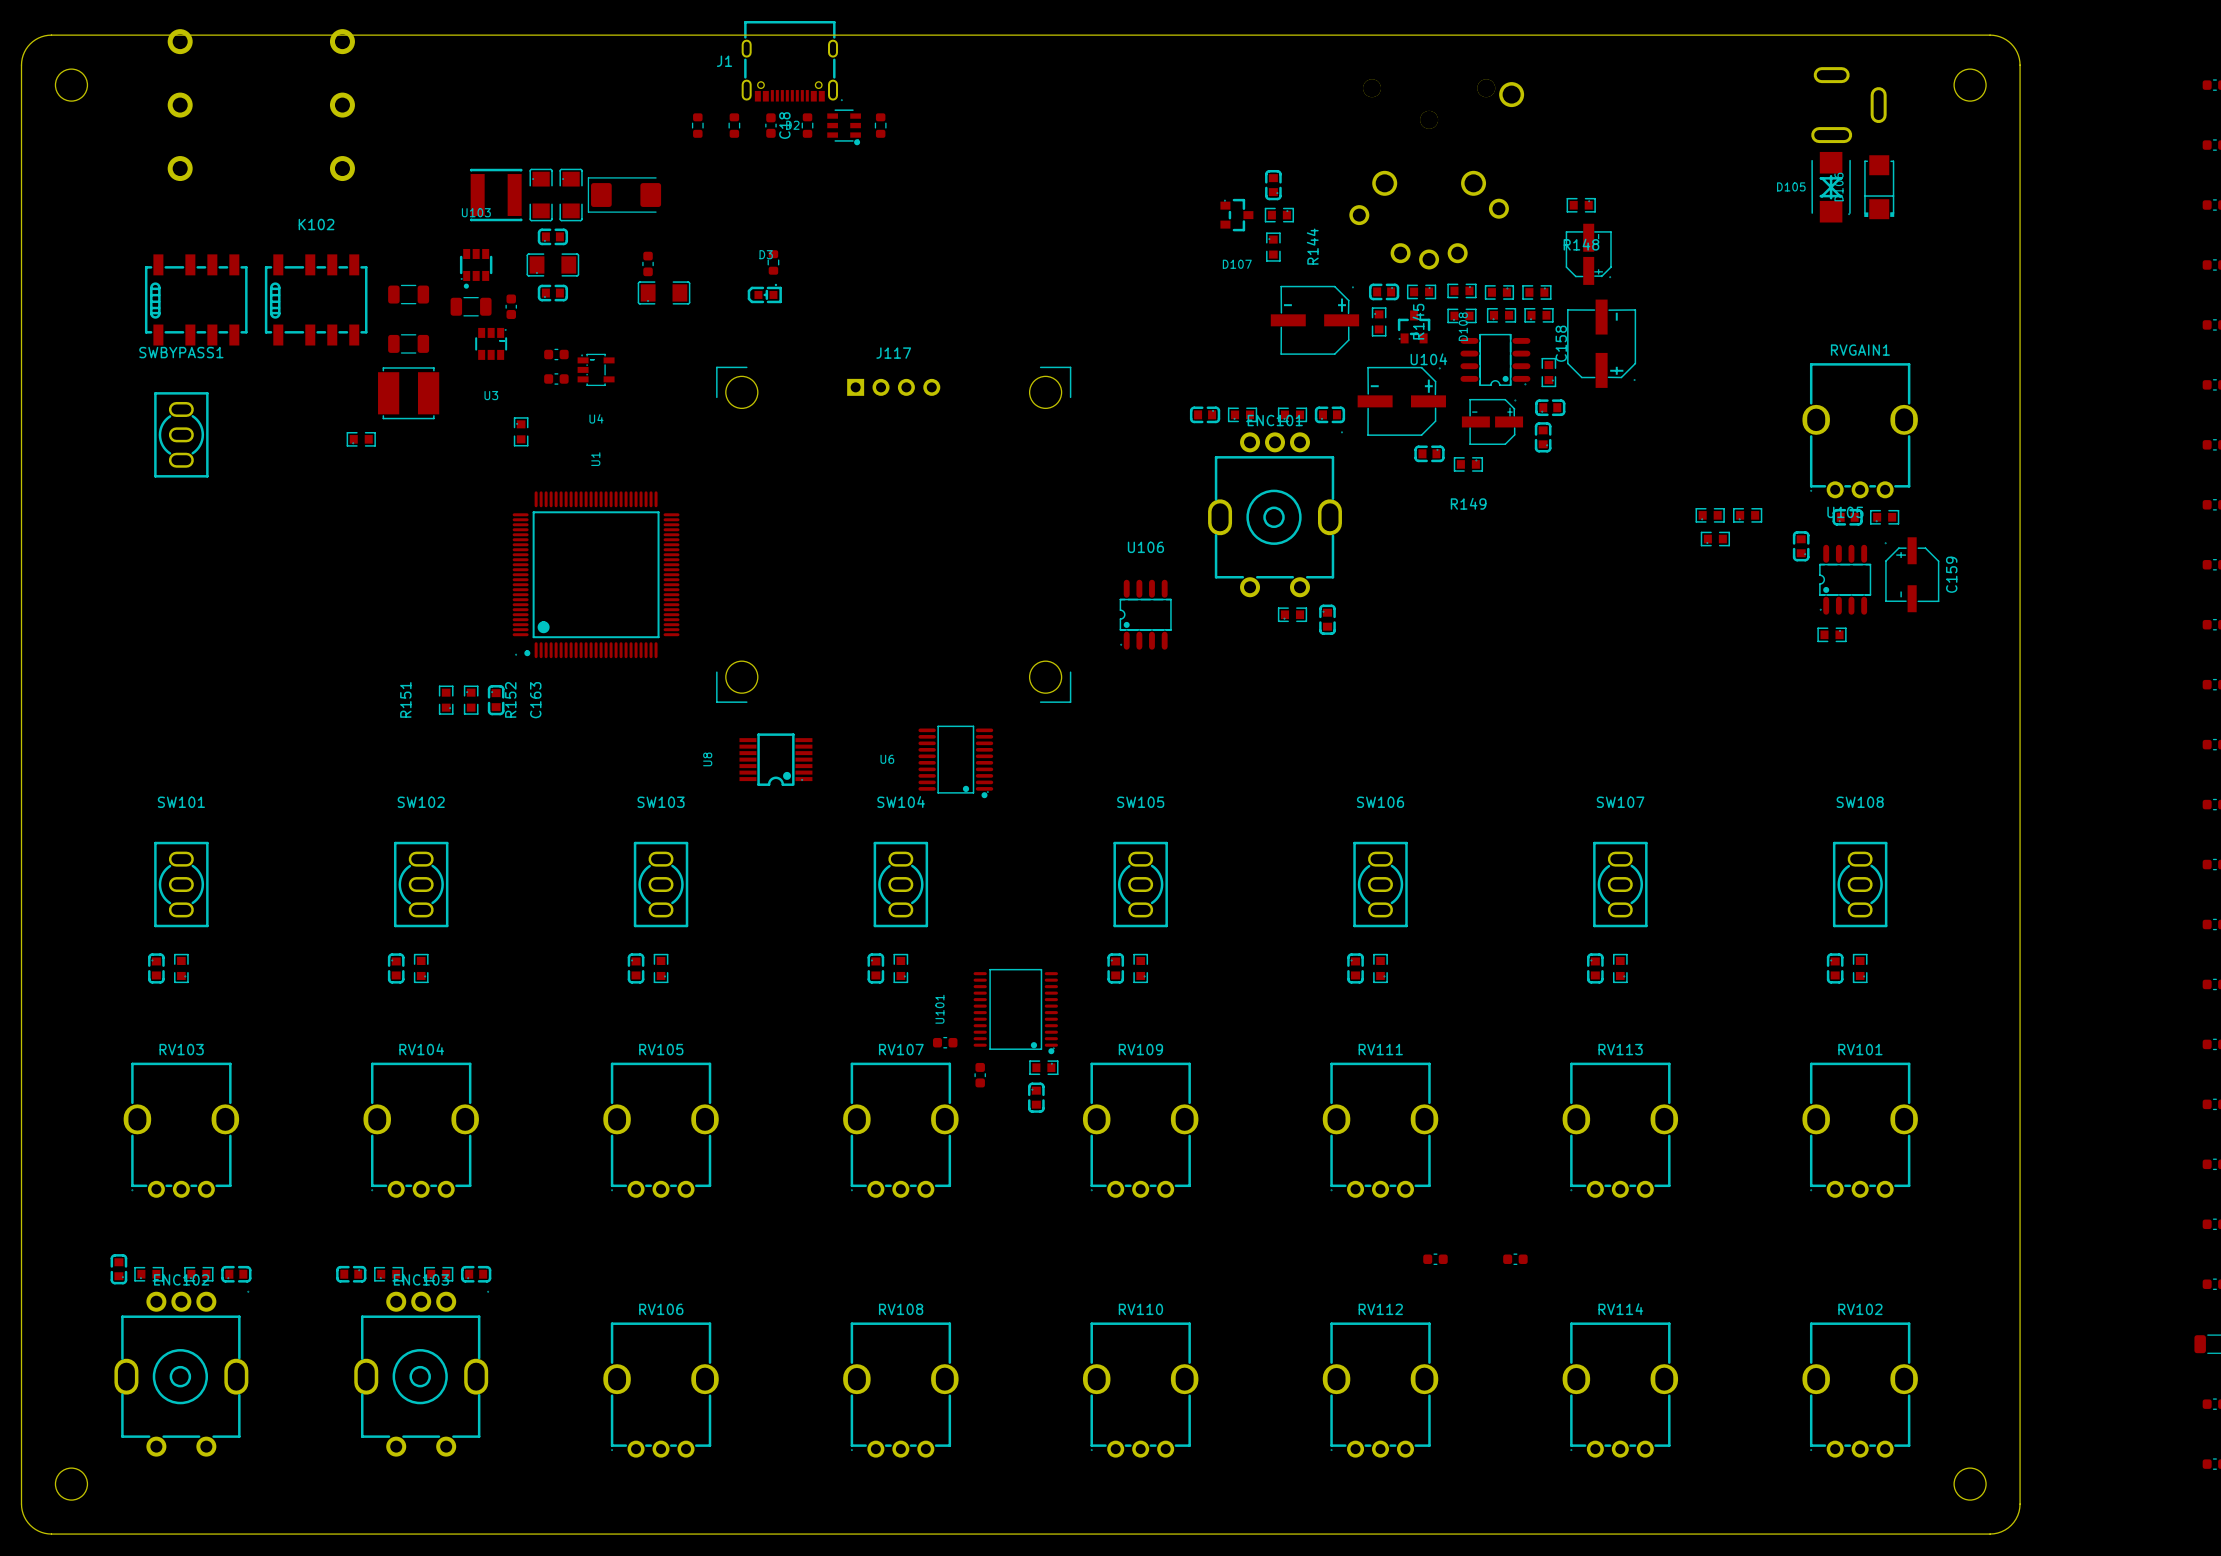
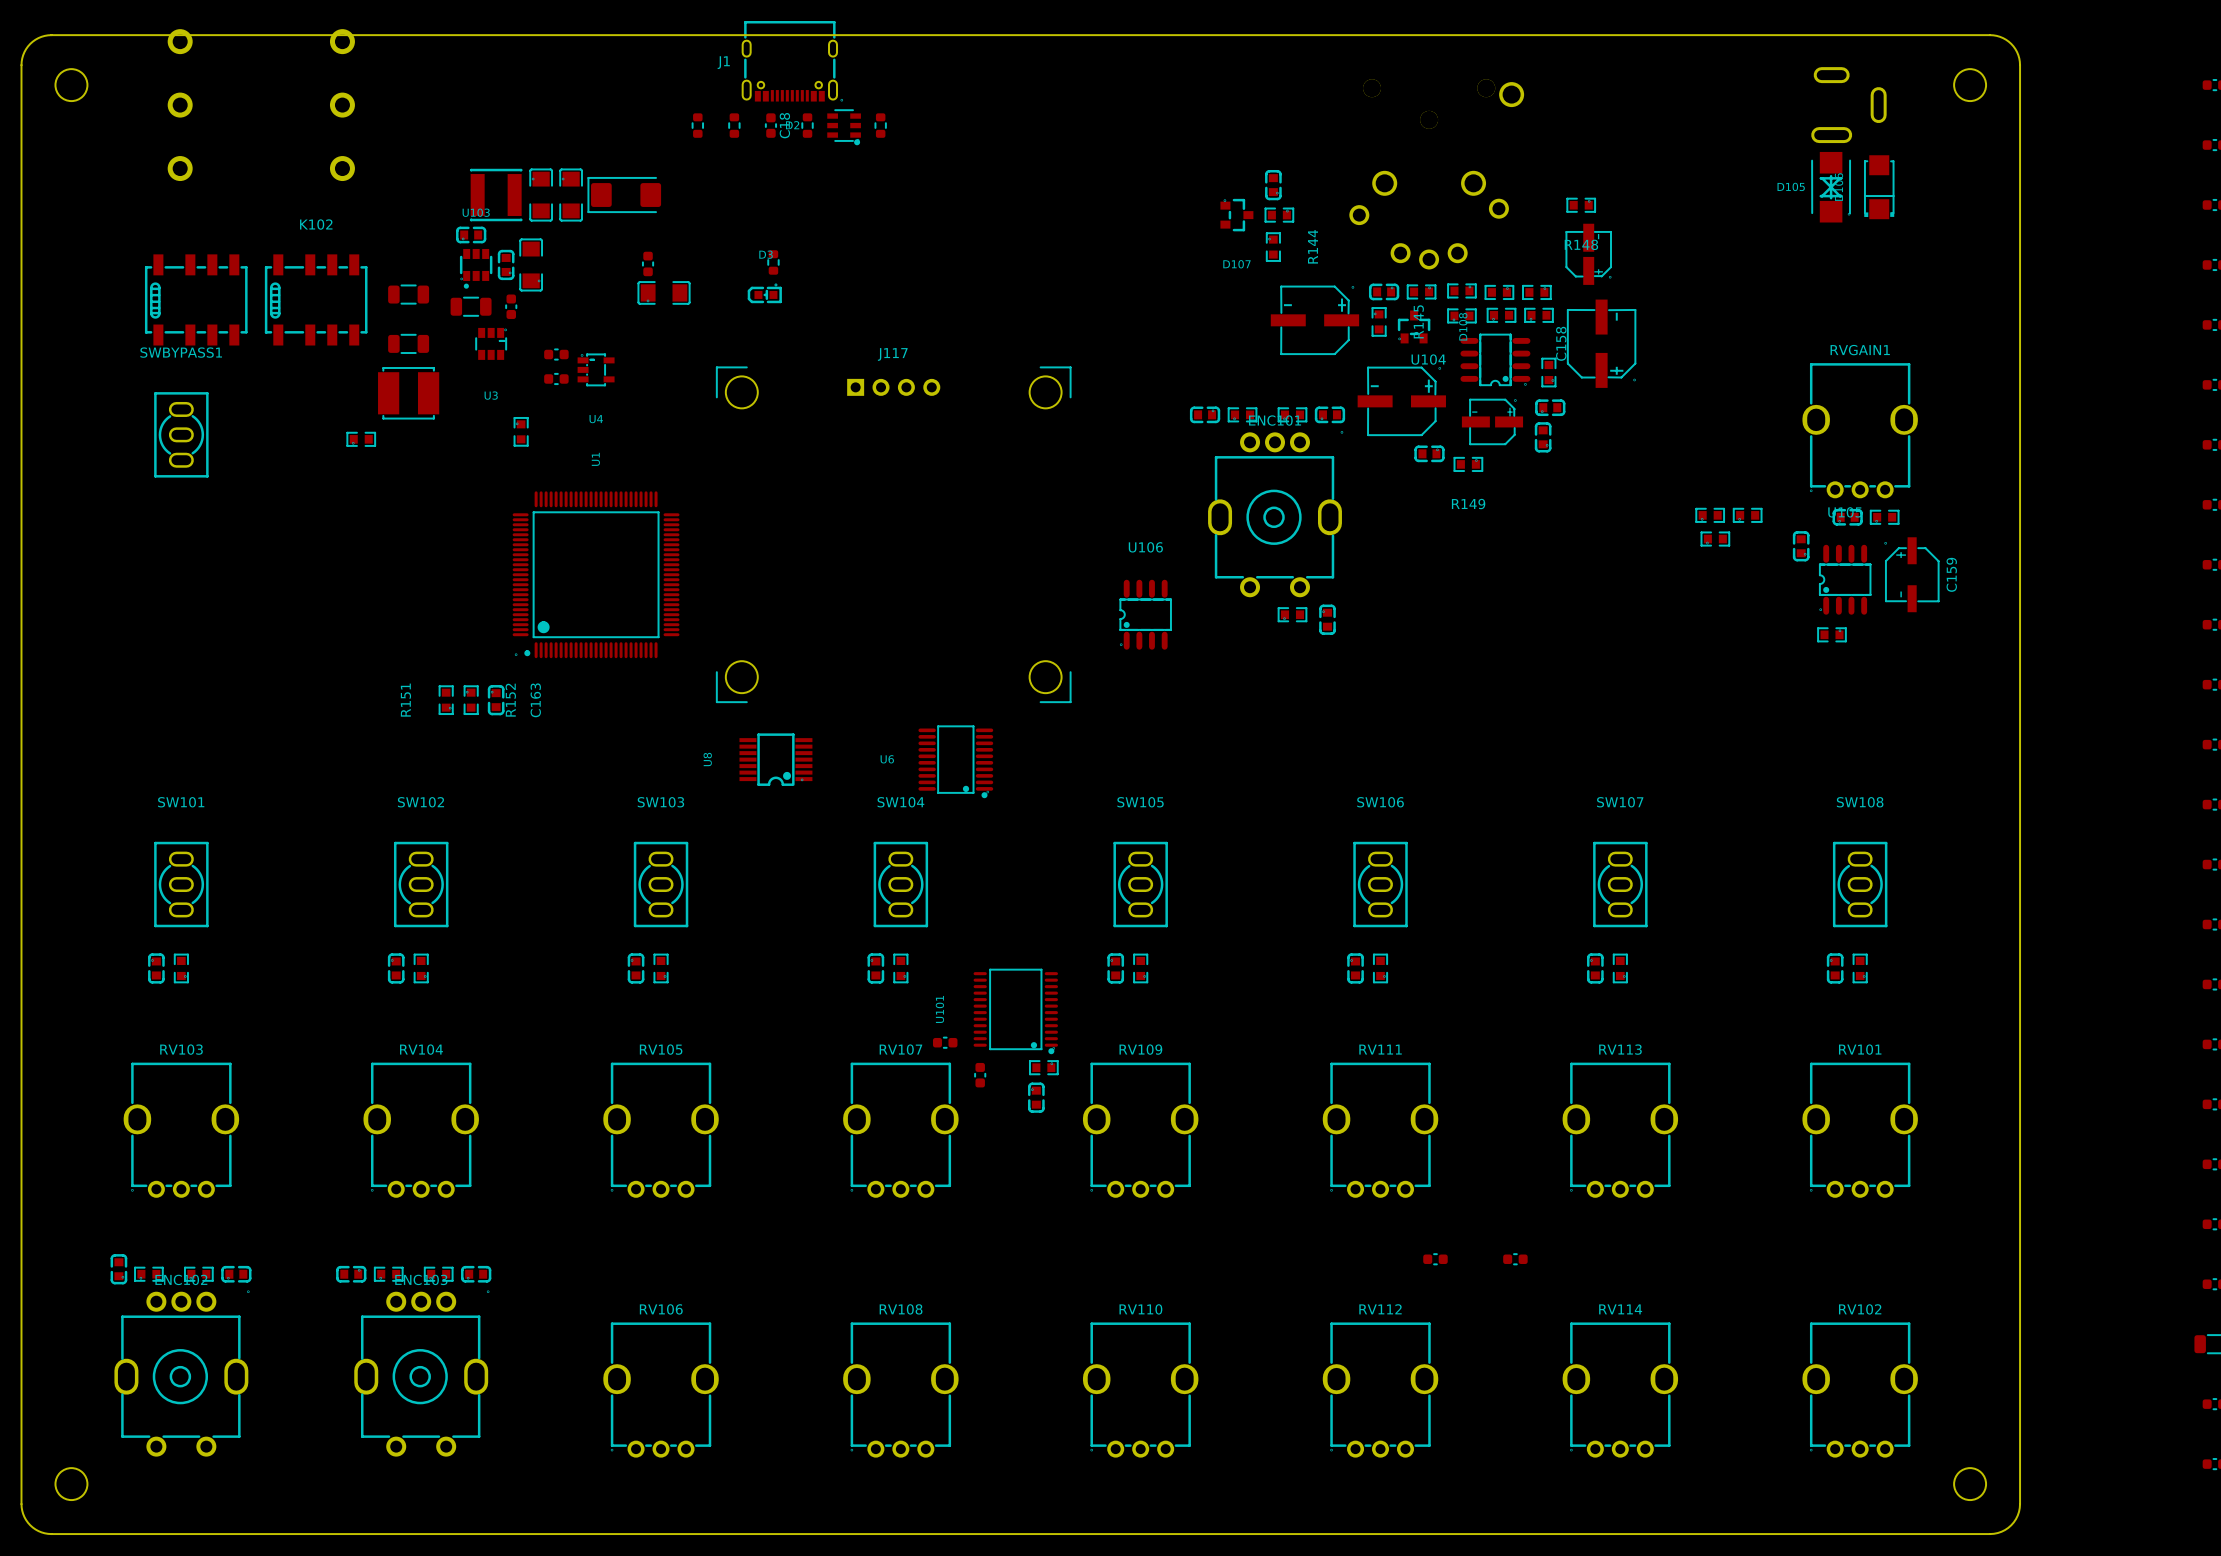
part: none -> (471, 234)
part: (552, 236) -> none
part: none -> (506, 264)
part rotation: 0° (552, 264) -> 90° counterclockwise (531, 264)
part: (552, 293) -> none

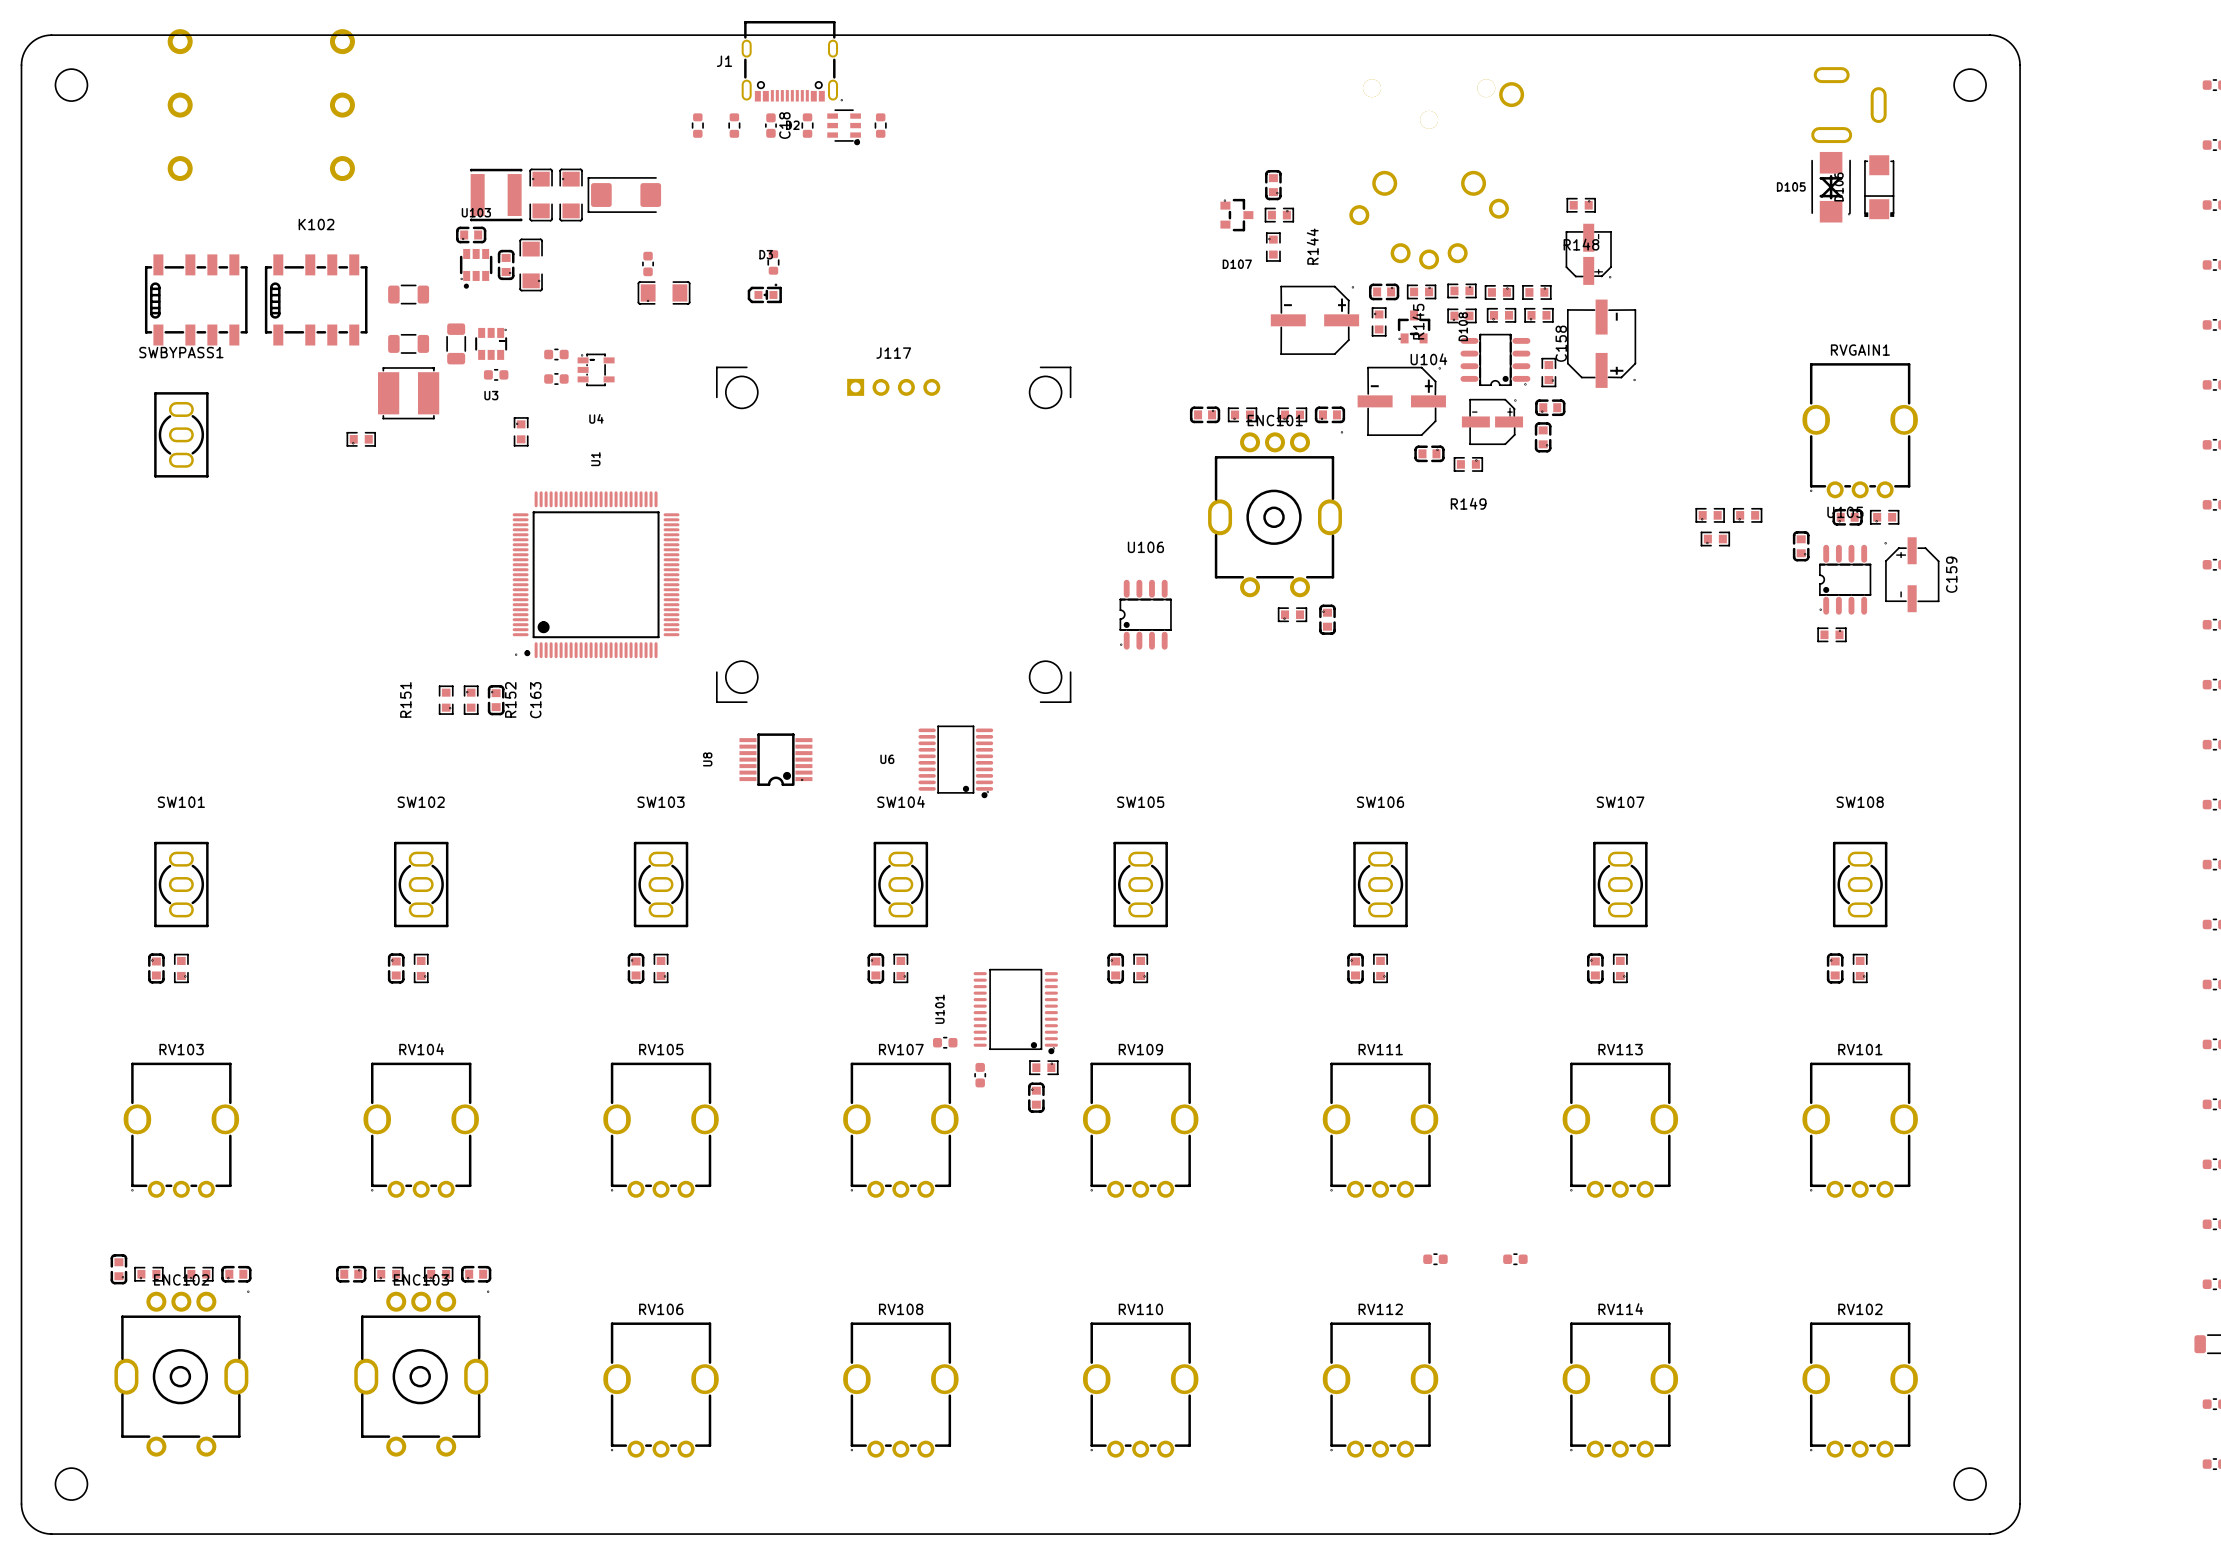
part rotation: 0° (471, 306) -> 90° clockwise (456, 343)
part position: (471, 306) -> (456, 343)
part rotation: 0° (511, 306) -> 90° clockwise (496, 374)
part position: (511, 306) -> (496, 374)

